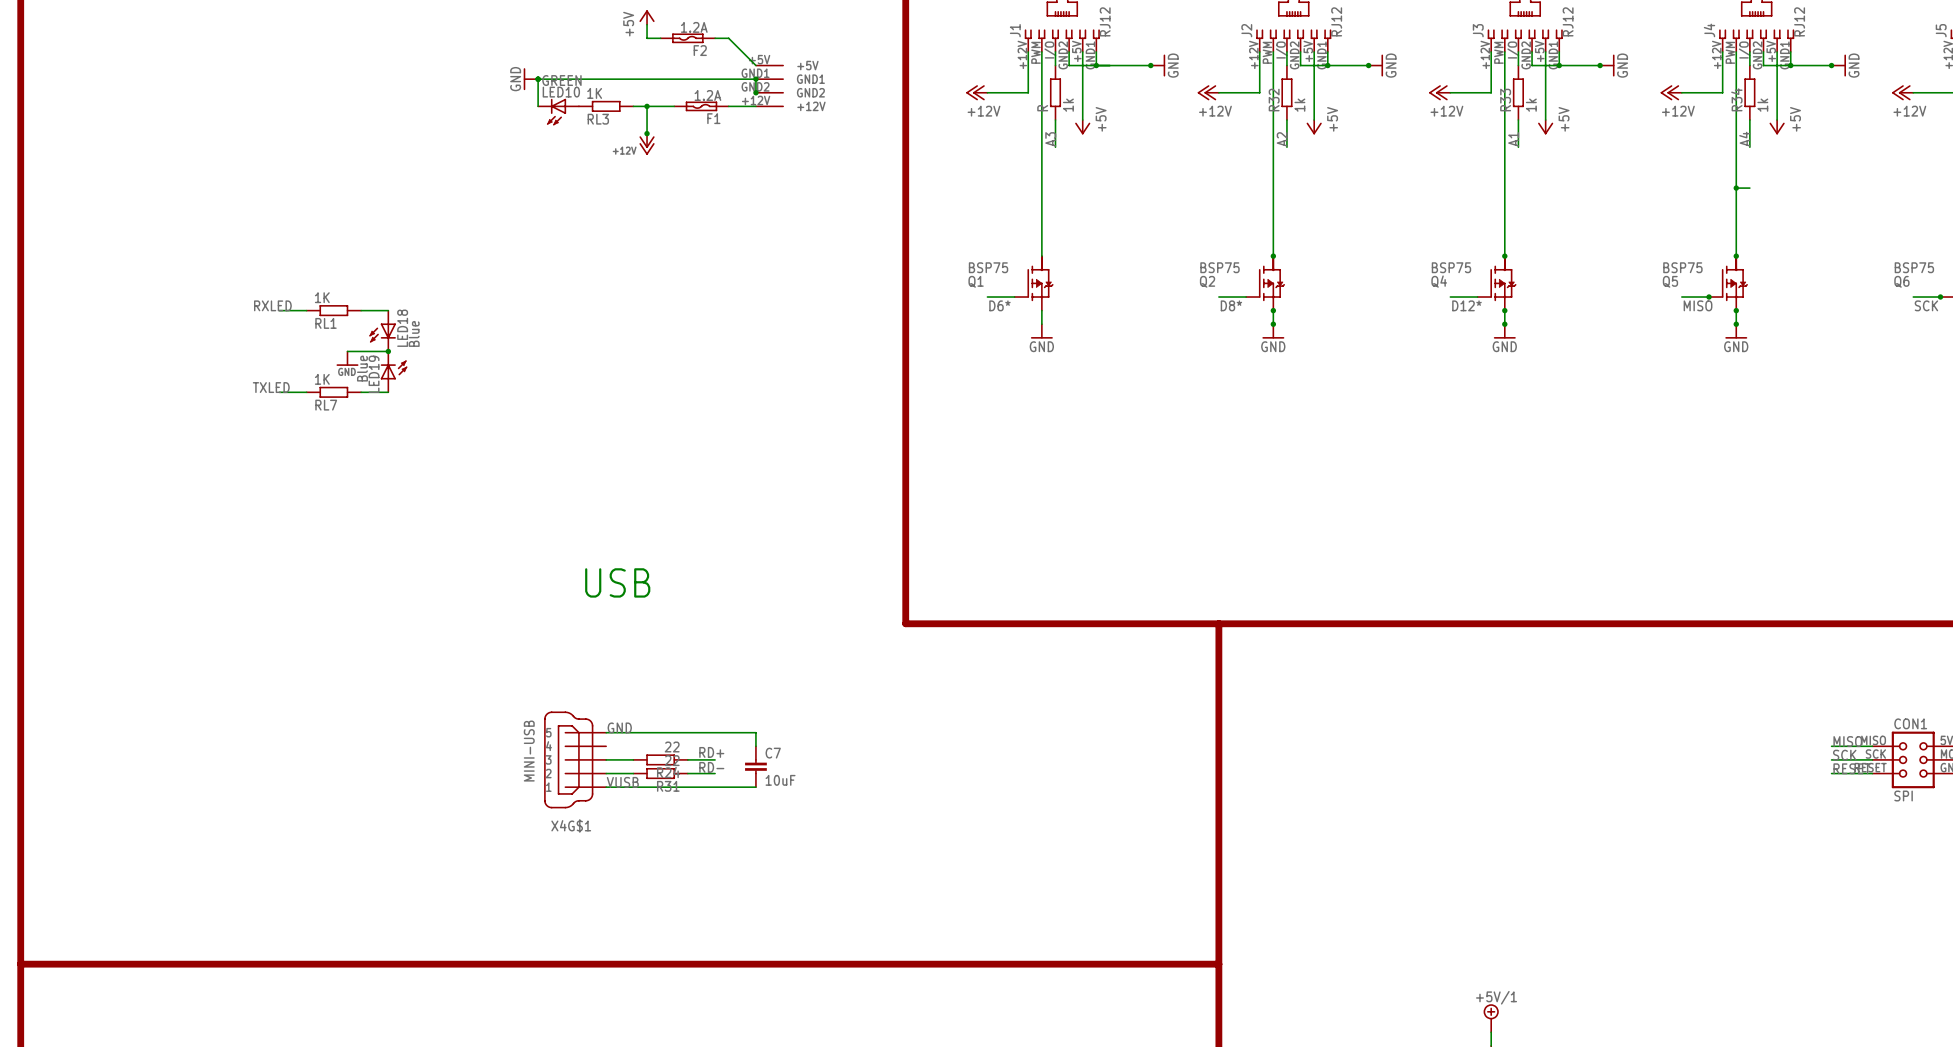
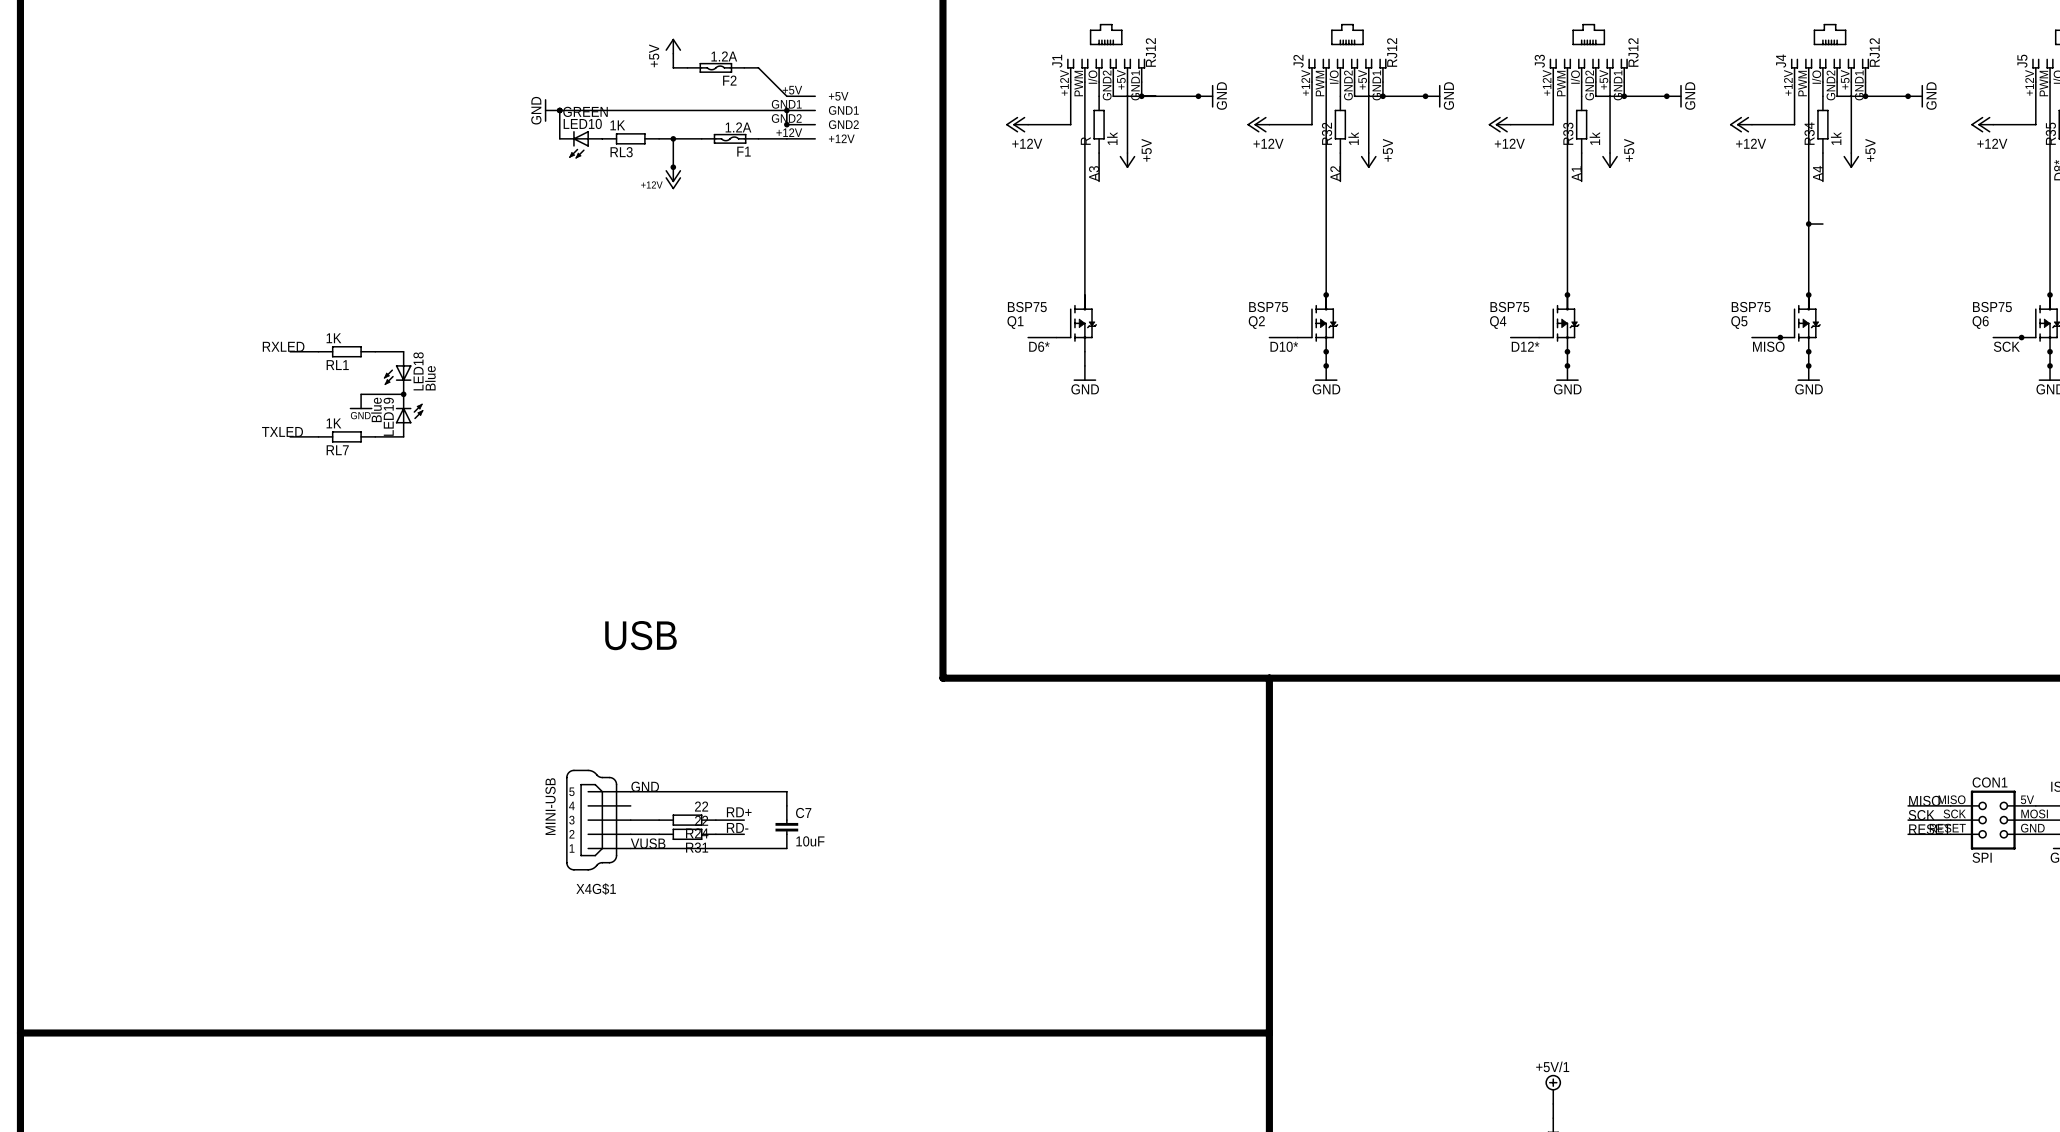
label: D8* (1231, 305) -> D10* (1284, 346)

